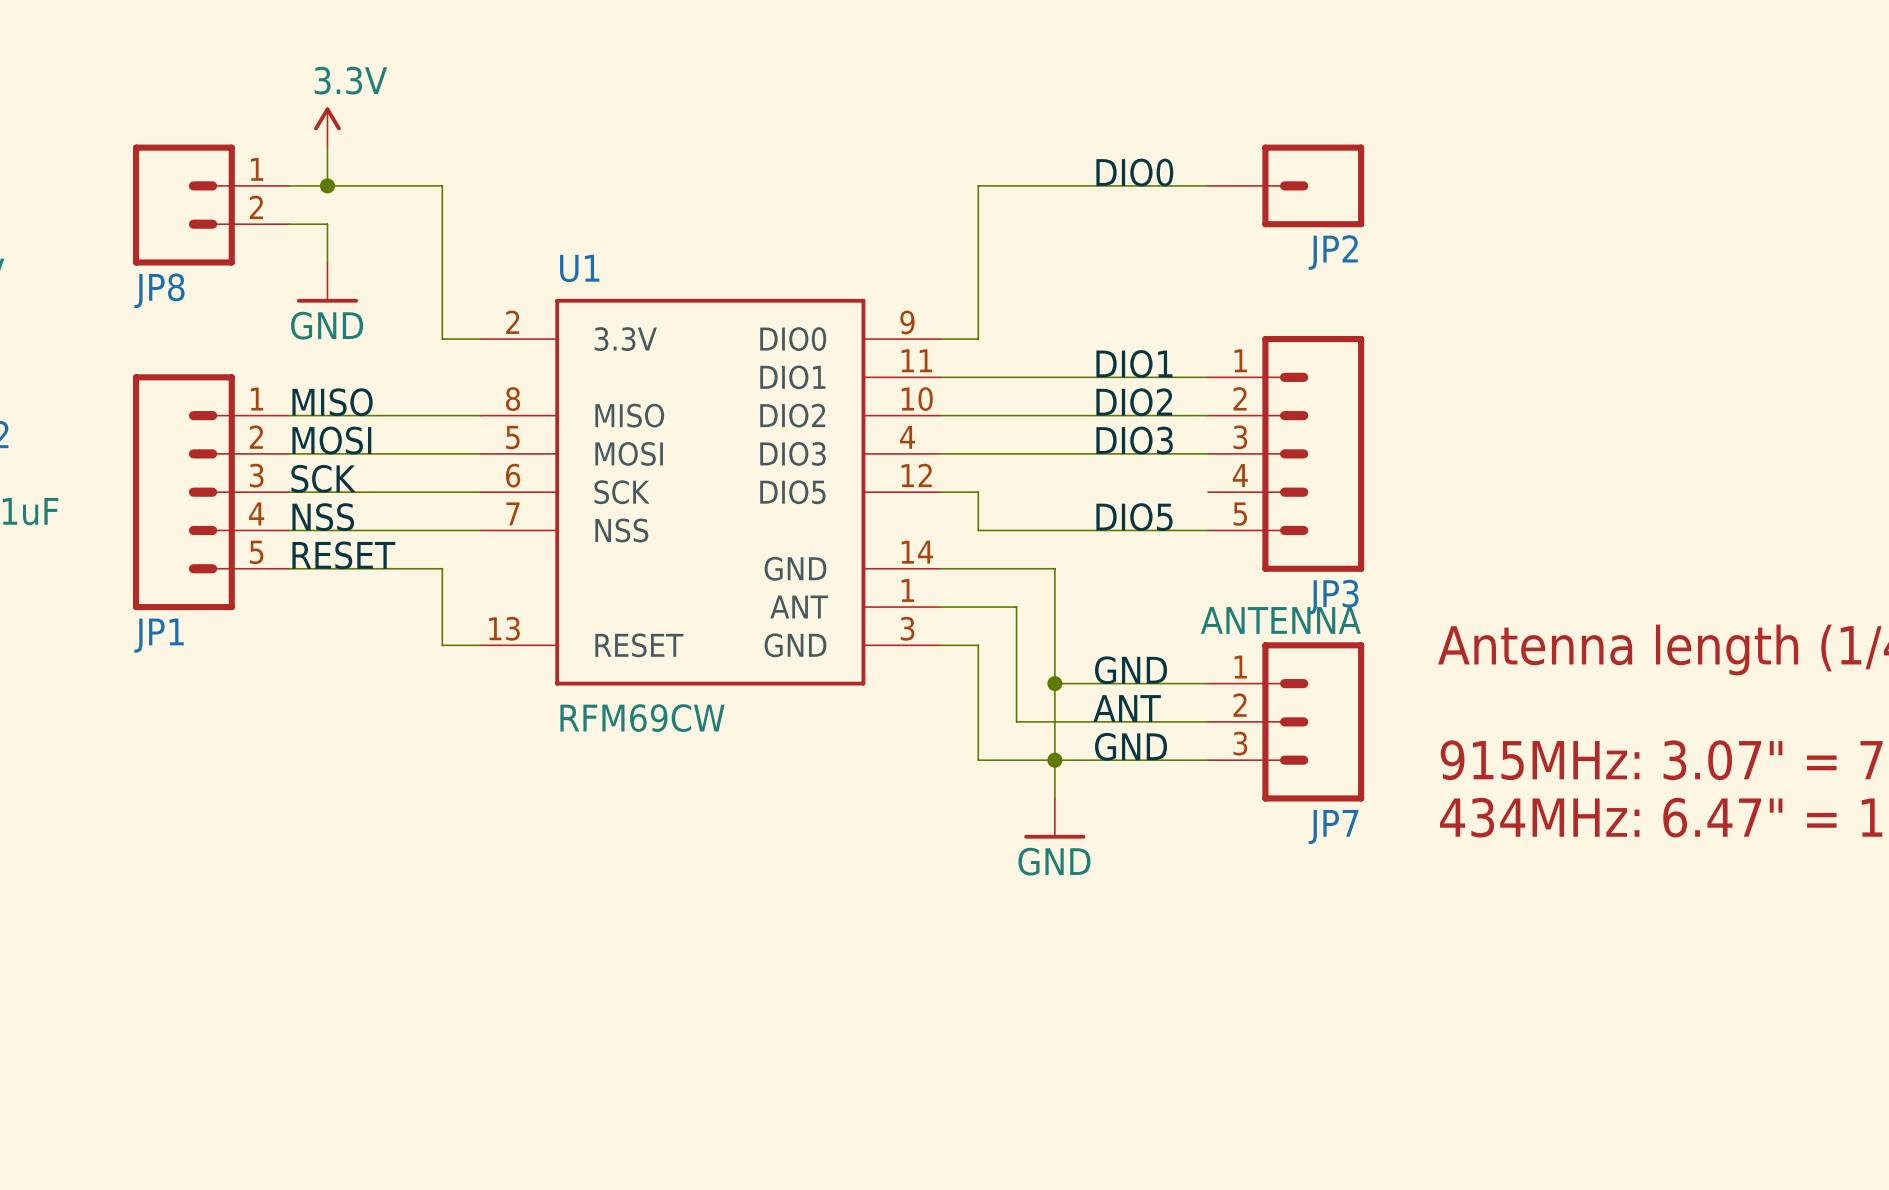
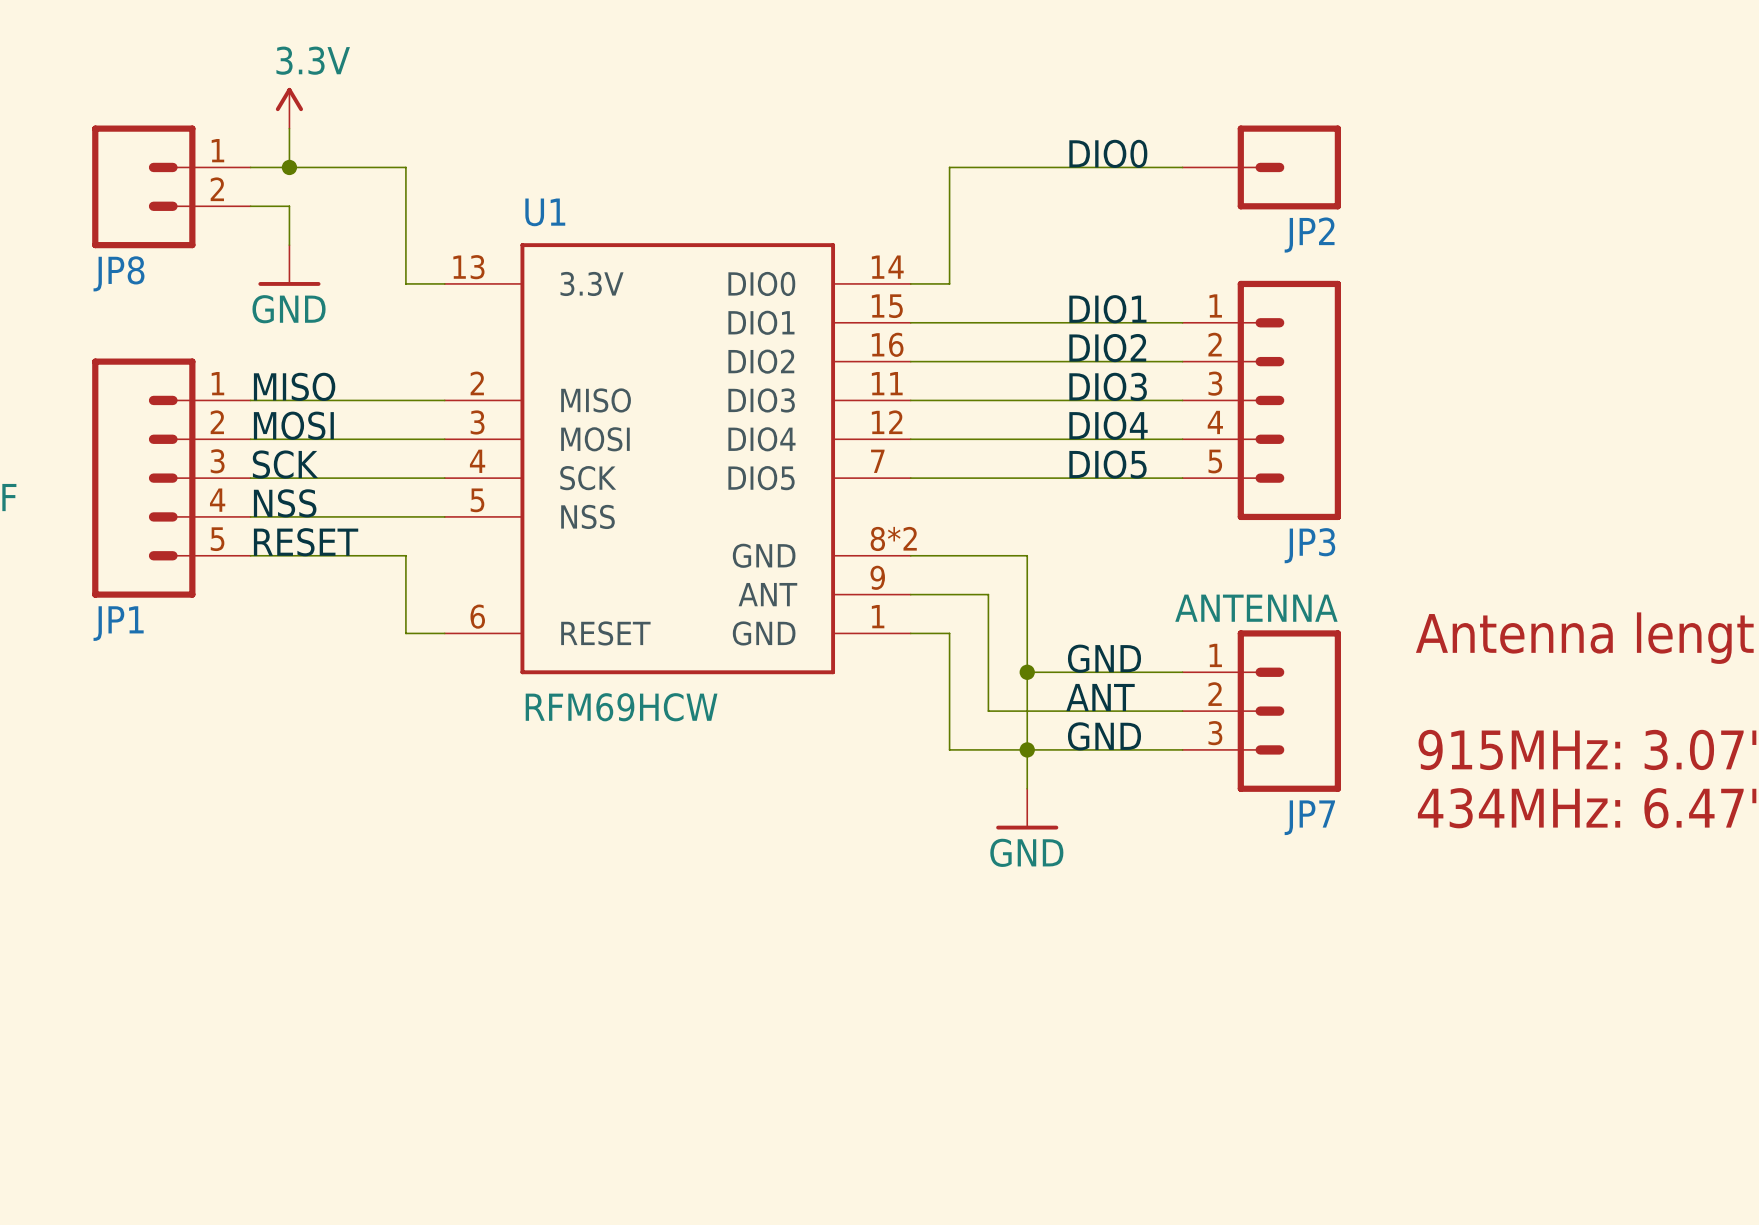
U1 symbol: [480, 298, 941, 686] -> [444, 243, 911, 675]
wire: (442, 300) (442, 339) (480, 339) -> (405, 283) (444, 283)
wire: (978, 300) (978, 339) -> (949, 283) (910, 283)
label: none -> DIO1 (1107, 309)
wire: none -> (949, 322) (1182, 322)
label: DIO1 (1134, 363) -> DIO2 (1107, 348)
label: DIO2 (1134, 402) -> DIO3 (1108, 386)
label: DIO3 (1134, 440) -> DIO4 (1108, 425)
JP3 position: (1286, 453) -> (1261, 400)
wire: (978, 492) (978, 530) (1208, 530) -> (949, 478) (1182, 478)
label position: DIO5 (1134, 517) -> DIO5 (1108, 464)
U1 value: RFM69CW (642, 718) -> RFM69HCW (621, 707)

